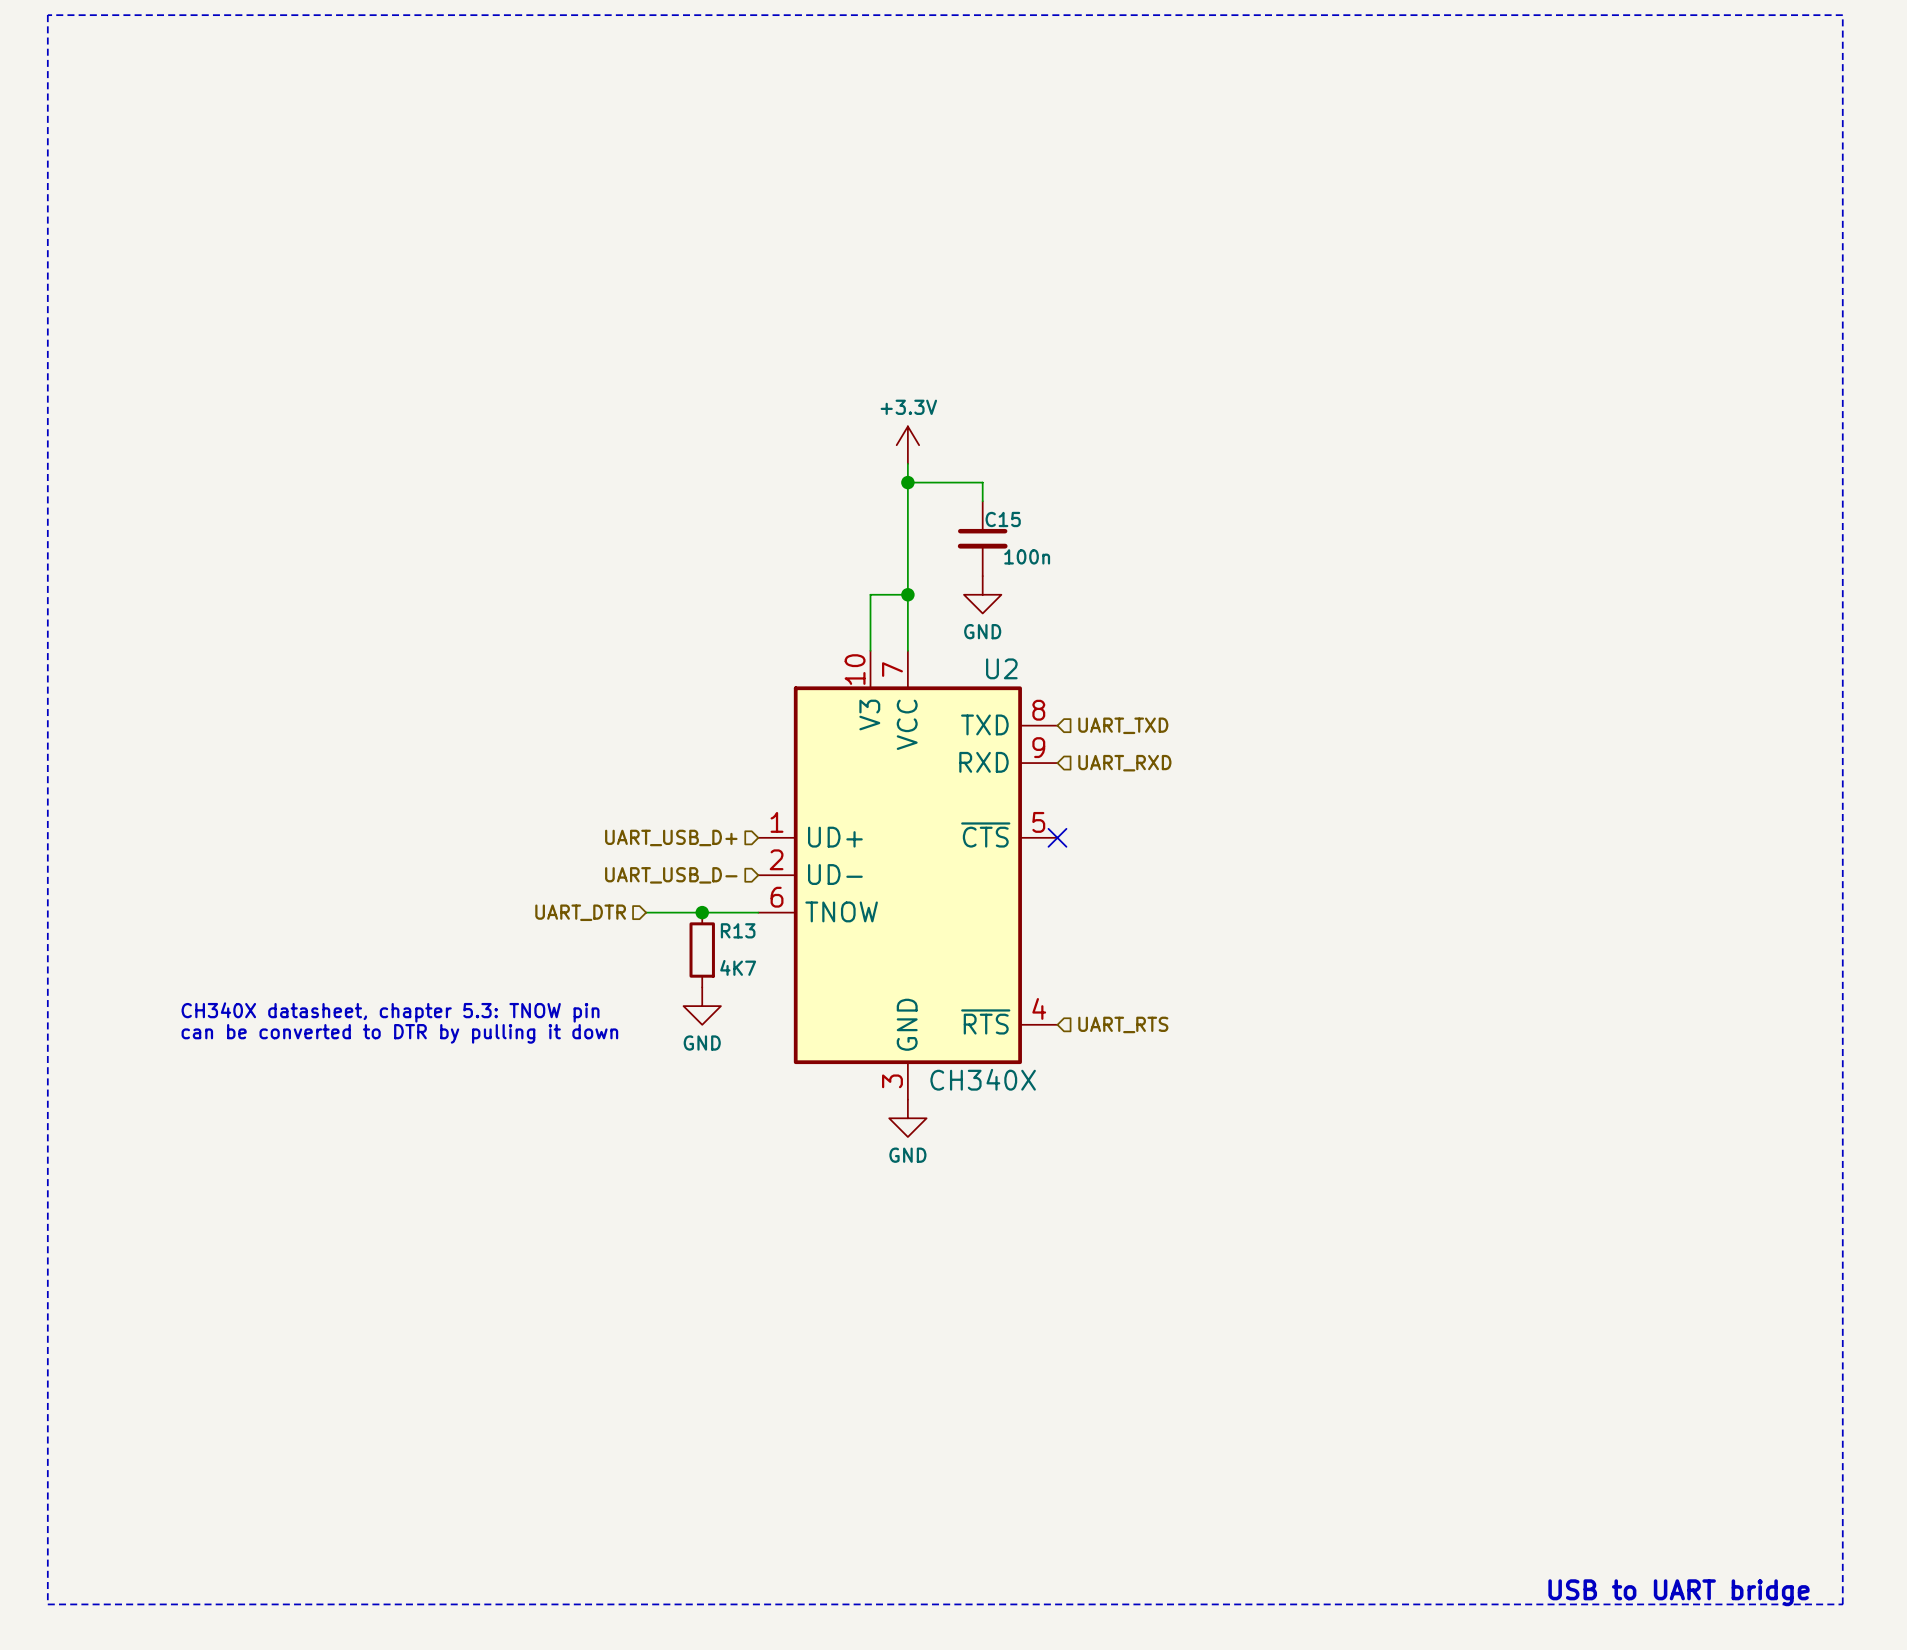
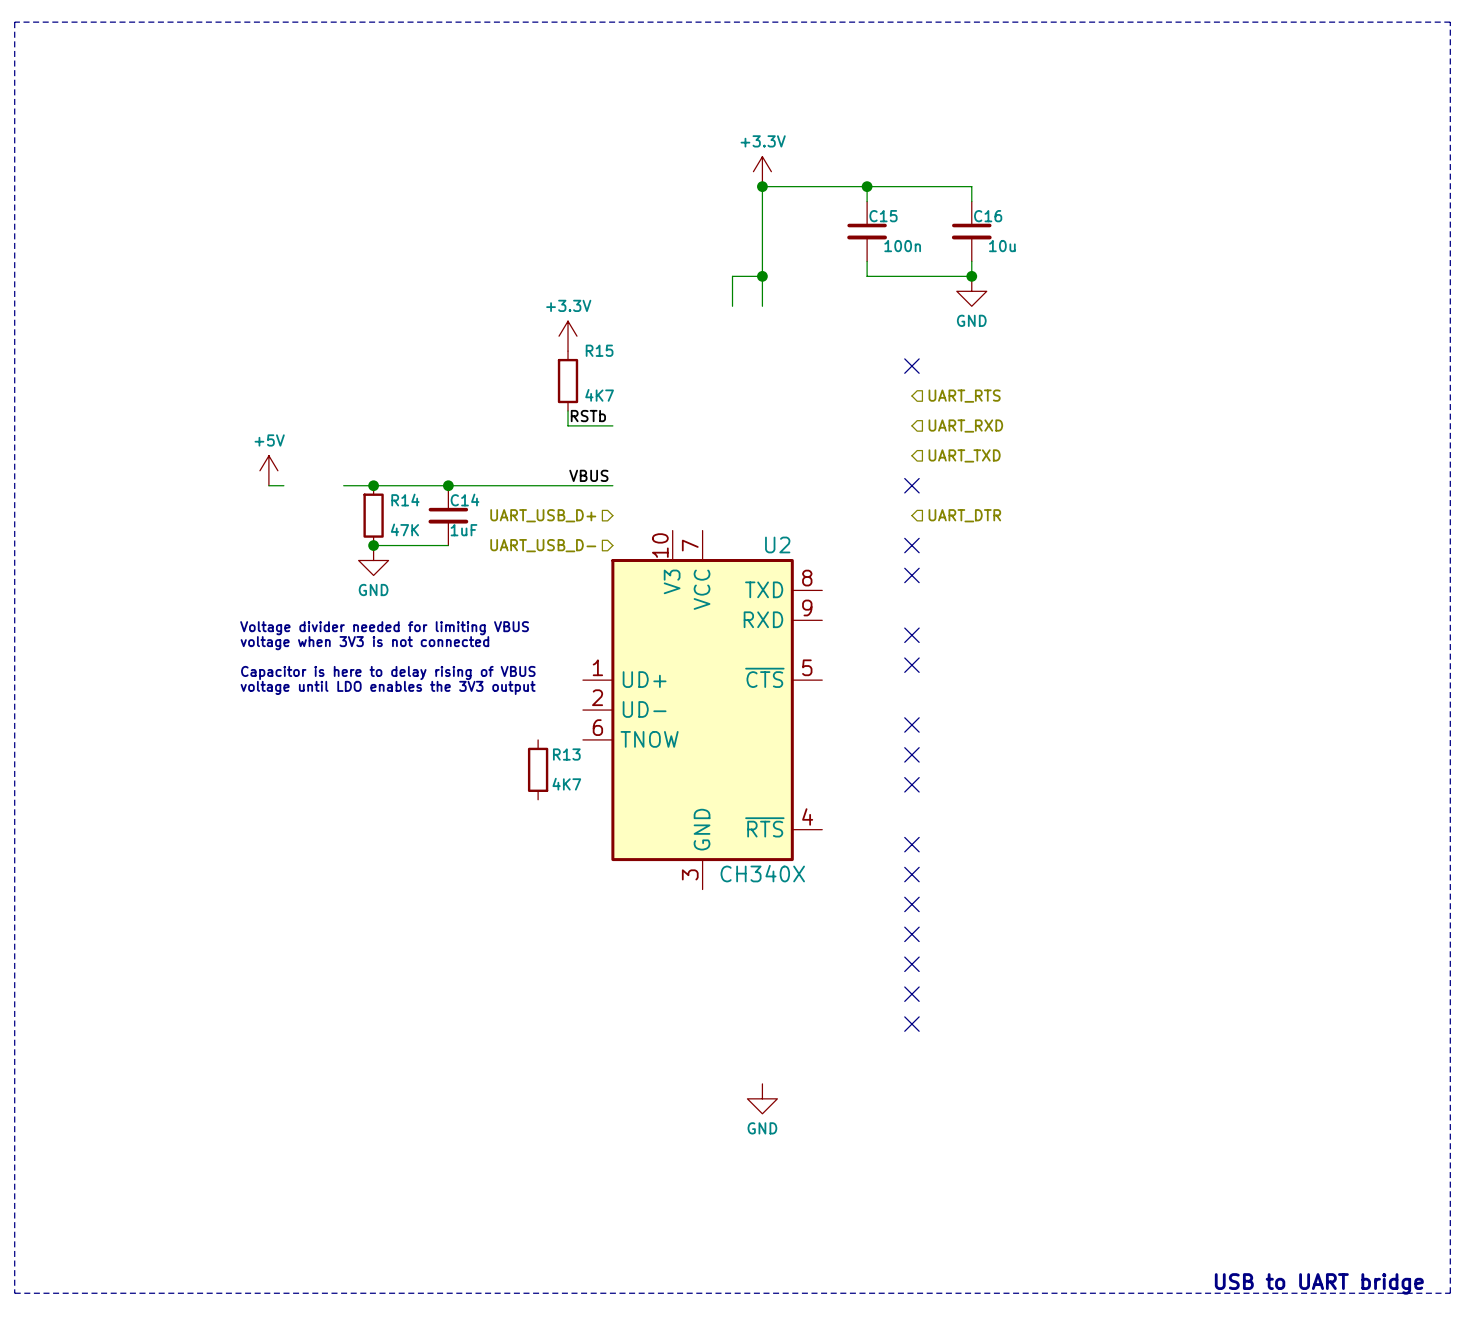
power symbol: none -> +3.3V (762, 171)
junction: none -> (762, 186)
wire: none -> (867, 186) (867, 201)
junction: none -> (867, 186)
wire: none -> (971, 201) (971, 186) (762, 186) (762, 306)
C16: none -> 10u (971, 231)
wire: none -> (867, 261) (867, 276) (971, 276) (971, 261)
wire: none -> (762, 276) (732, 276) (732, 306)
junction: none -> (762, 276)
junction: none -> (971, 276)
power symbol: none -> GND (971, 291)
power symbol: none -> +3.3V (568, 336)
power symbol: +3.3V (907, 445) -> none
no-connect mark: none -> (911, 366)
R15: none -> 4K7 (568, 381)
wire: (907, 463) (907, 650) -> none
wire: (907, 482) (982, 482) (982, 501) -> none
junction: (907, 482) -> none
hierarchical label: none -> UART_RTS (964, 396)
wire: none -> (568, 410) (568, 425) (612, 425)
label: none -> RSTb (588, 416)
C15 position: (982, 538) -> (867, 231)
power symbol: none -> +5V (268, 470)
label: none -> VBUS (588, 475)
wire: none -> (268, 485) (283, 485)
wire: none -> (343, 485) (612, 485)
junction: none -> (373, 485)
junction: none -> (448, 485)
wire: (907, 594) (870, 594) (870, 650) -> none
junction: (907, 594) -> none
power symbol: GND (982, 594) -> none
no-connect mark: none -> (911, 485)
R14: none -> 47K (373, 515)
C14: none -> 1uF (448, 515)
hierarchical label: none -> UART_DTR (964, 515)
wire: none -> (373, 545) (448, 545)
junction: none -> (373, 545)
no-connect mark: none -> (911, 545)
power symbol: none -> GND (373, 560)
no-connect mark: none -> (911, 575)
hierarchical label position: UART_TXD (1123, 725) -> UART_TXD (964, 455)
hierarchical label position: UART_RXD (1124, 763) -> UART_RXD (965, 426)
text: none -> Voltage divider needed for limiting VBUS (384, 628)
no-connect mark: none -> (911, 635)
text: none -> voltage when 3V3 is not connected (364, 643)
no-connect mark: none -> (911, 665)
text: none -> Capacitor is here to delay rising of VBUS (388, 672)
hierarchical label position: UART_USB_D+ (671, 837) -> UART_USB_D+ (543, 515)
no-connect mark: (1057, 837) -> none
text: none -> voltage until LDO enables the 3V3 output (388, 687)
hierarchical label position: UART_USB_D- (671, 875) -> UART_USB_D- (543, 545)
no-connect mark: none -> (911, 724)
hierarchical label: UART_DTR (580, 912) -> none
wire: (646, 912) (758, 912) -> none
junction: (702, 912) -> none
no-connect mark: none -> (911, 754)
no-connect mark: none -> (911, 784)
power symbol: GND (702, 1006) -> none
text: CH340X datasheet, chapter 5.3: TNOW pin (390, 1012) -> none
hierarchical label: UART_RTS (1123, 1024) -> none
text: can be converted to DTR by pulling it down (399, 1033) -> none
no-connect mark: none -> (911, 844)
no-connect mark: none -> (911, 874)
power symbol: GND (907, 1118) -> none
no-connect mark: none -> (911, 904)
no-connect mark: none -> (911, 934)
no-connect mark: none -> (911, 964)
no-connect mark: none -> (911, 994)
no-connect mark: none -> (911, 1024)
power symbol: none -> GND (762, 1098)

